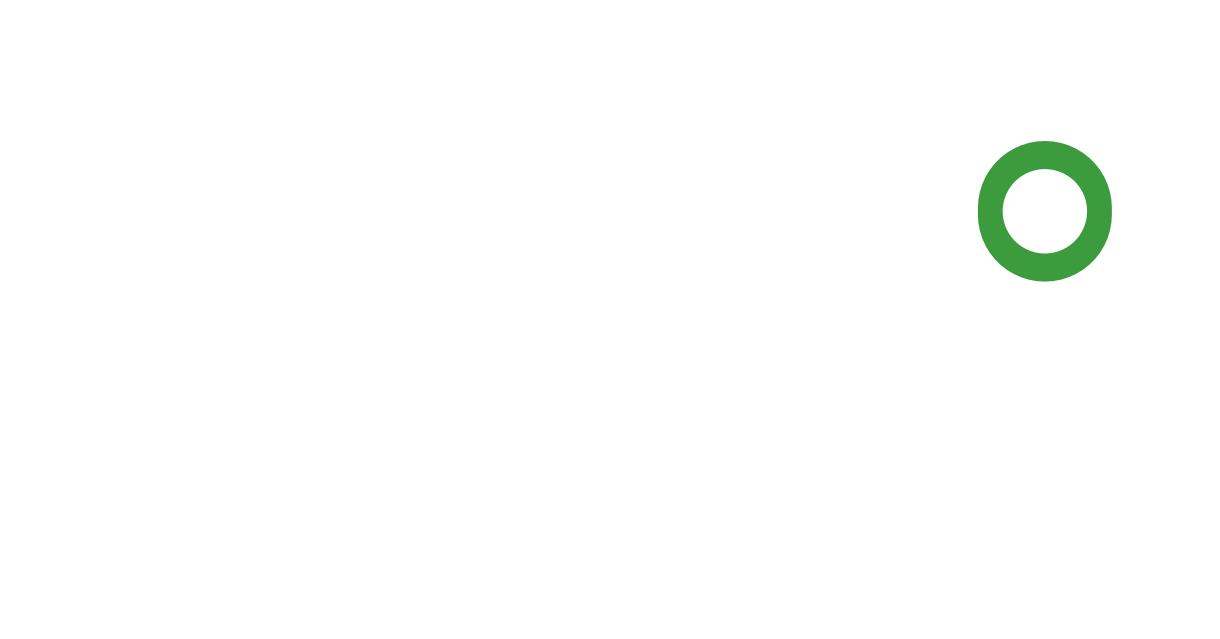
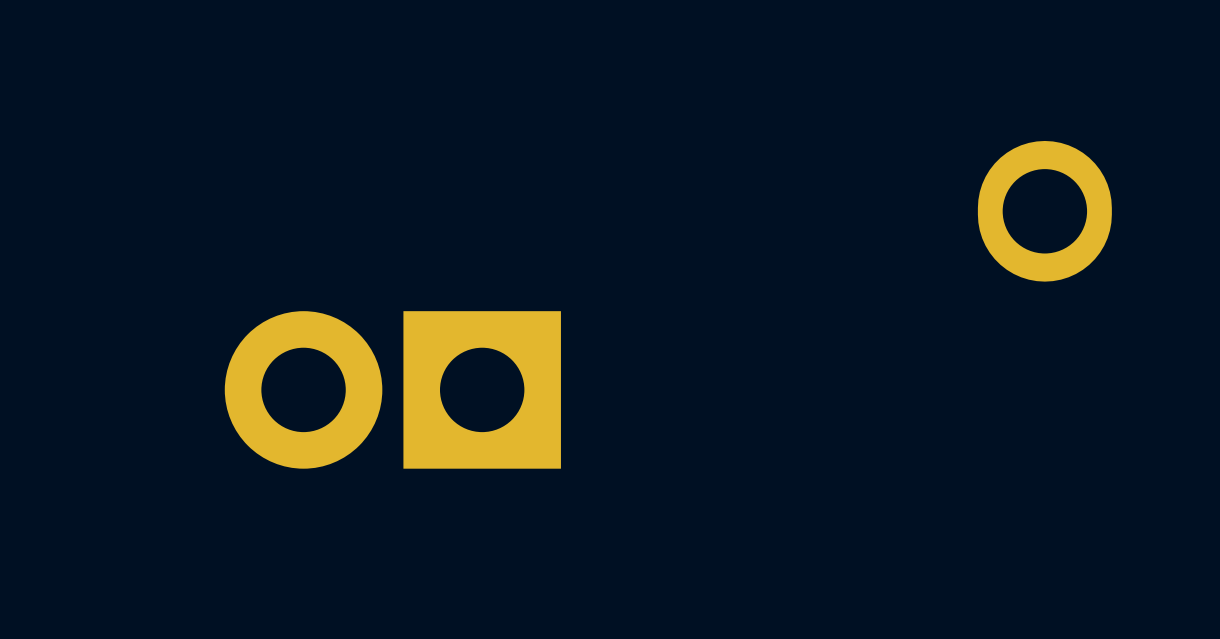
part: none -> (392, 389)

